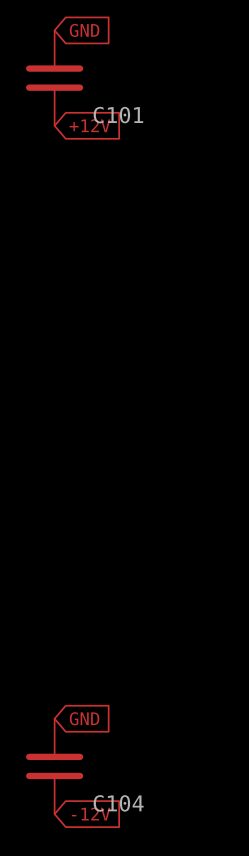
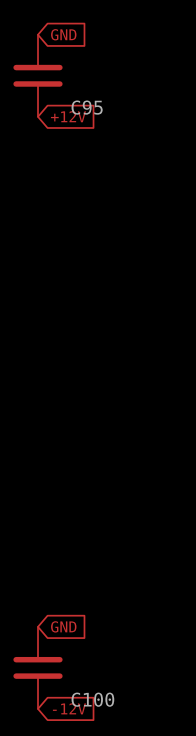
C101 name: C101 (118, 115) -> C95 (87, 107)
C104 name: C104 (118, 803) -> C100 (92, 699)

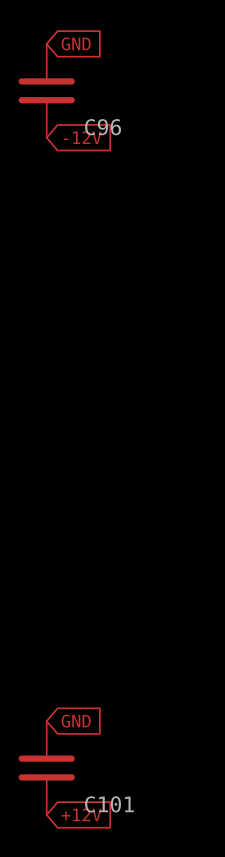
C95 name: C95 (87, 107) -> C96 (103, 127)
global label: +12V (68, 116) -> -12V (82, 137)
C100 name: C100 (92, 699) -> C101 (109, 804)
global label: -12V (69, 708) -> +12V (81, 814)

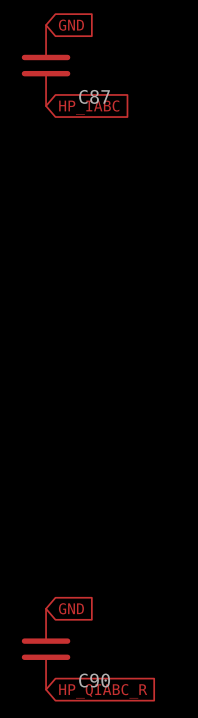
C96 name: C96 (103, 127) -> C87 (94, 96)
global label: -12V (82, 137) -> HP_IABC (89, 107)
C101 name: C101 (109, 804) -> C90 (94, 680)
global label: +12V (81, 814) -> HP_QIABC_R (103, 691)

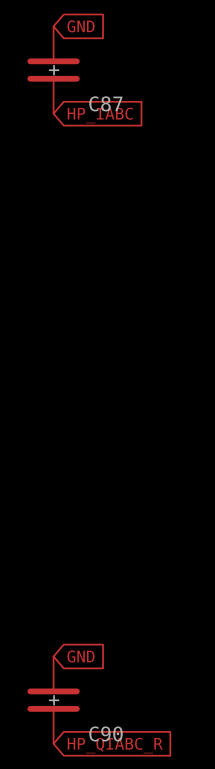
C87 pin name: none -> + (54, 70)
C90 pin name: none -> + (54, 700)

